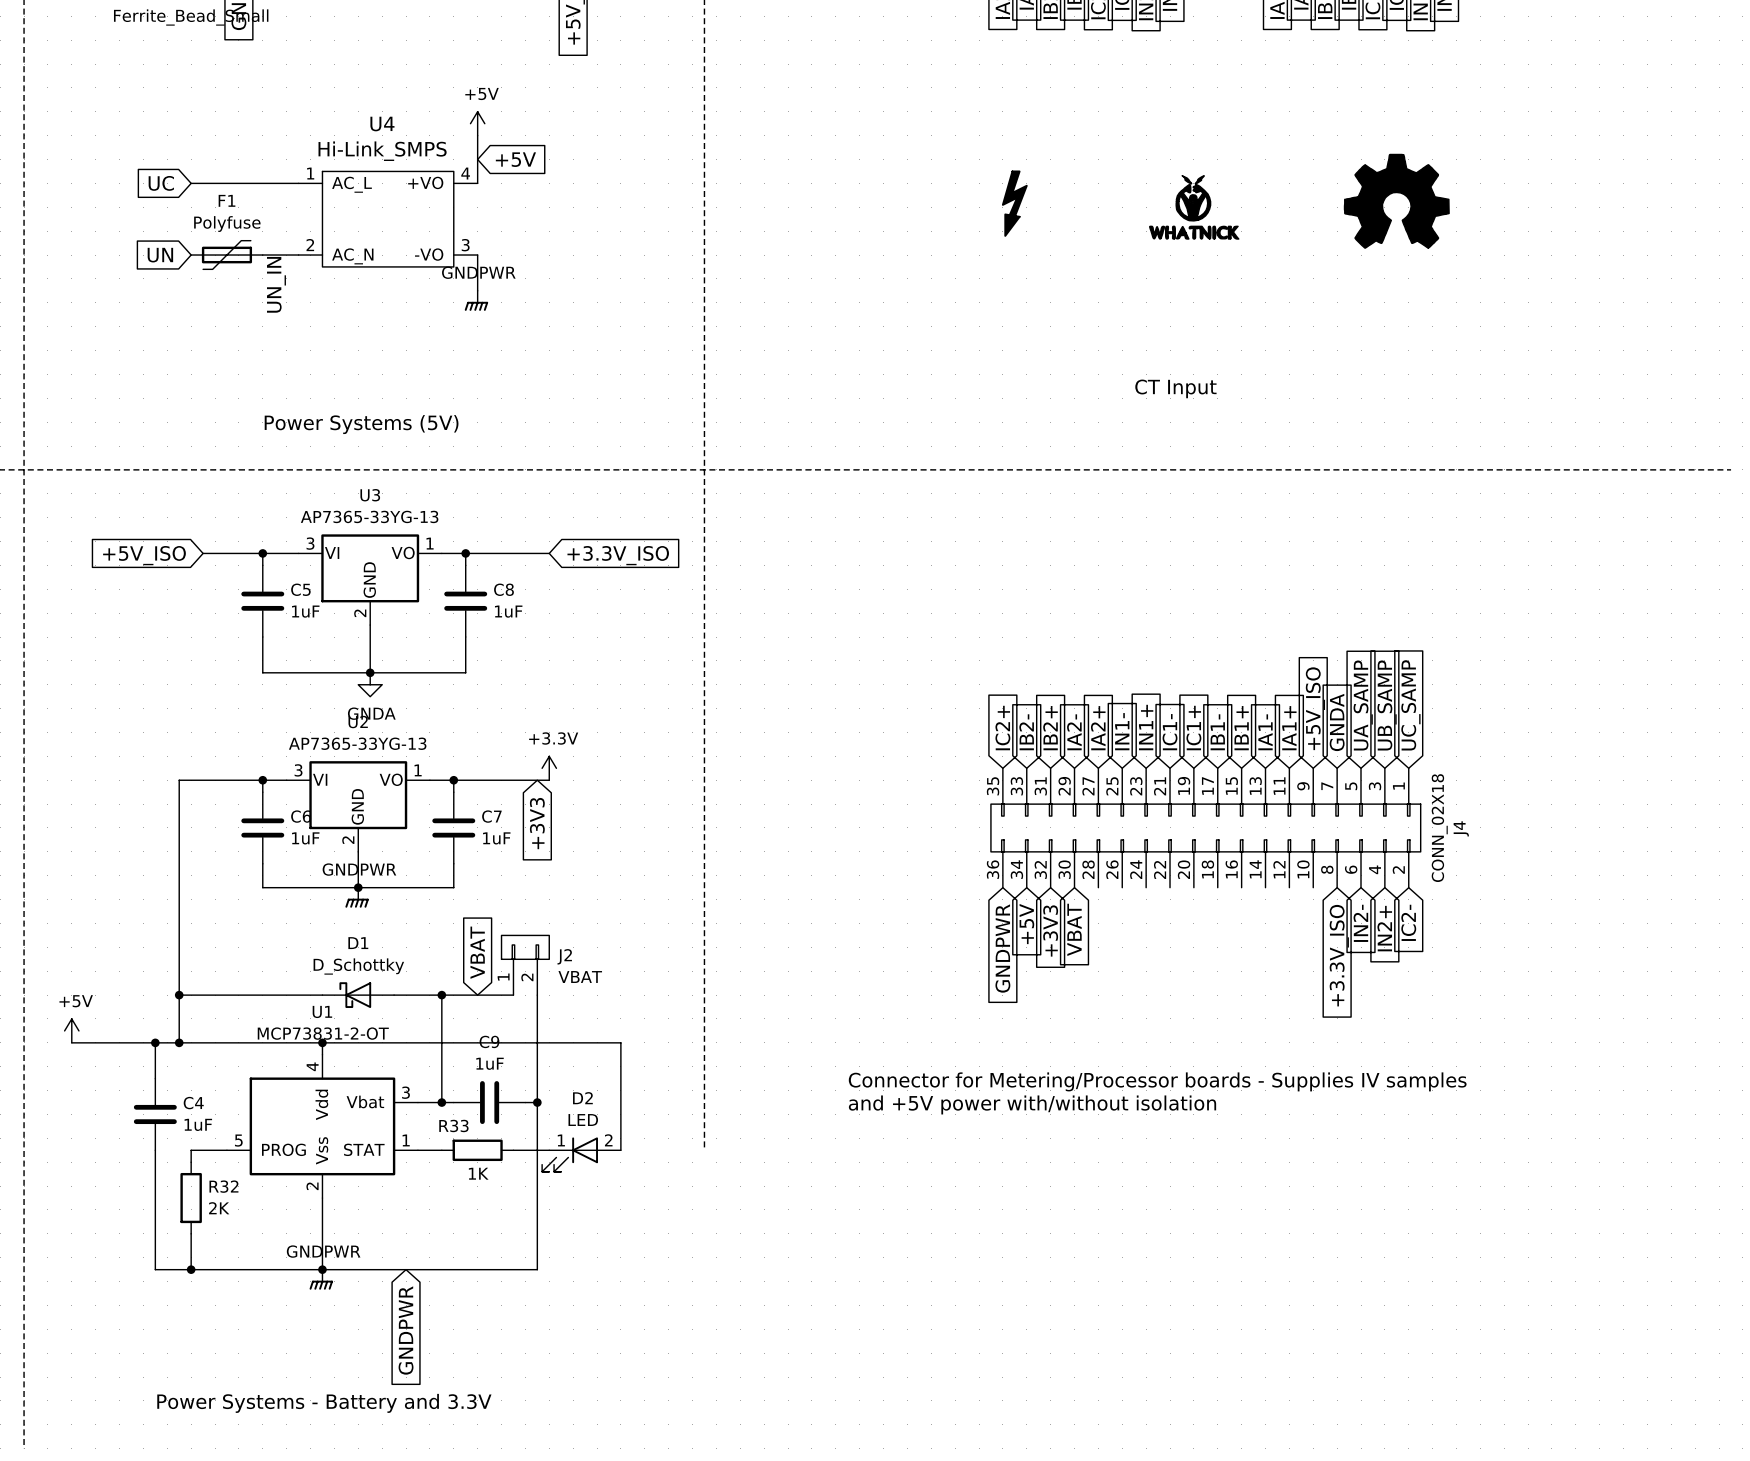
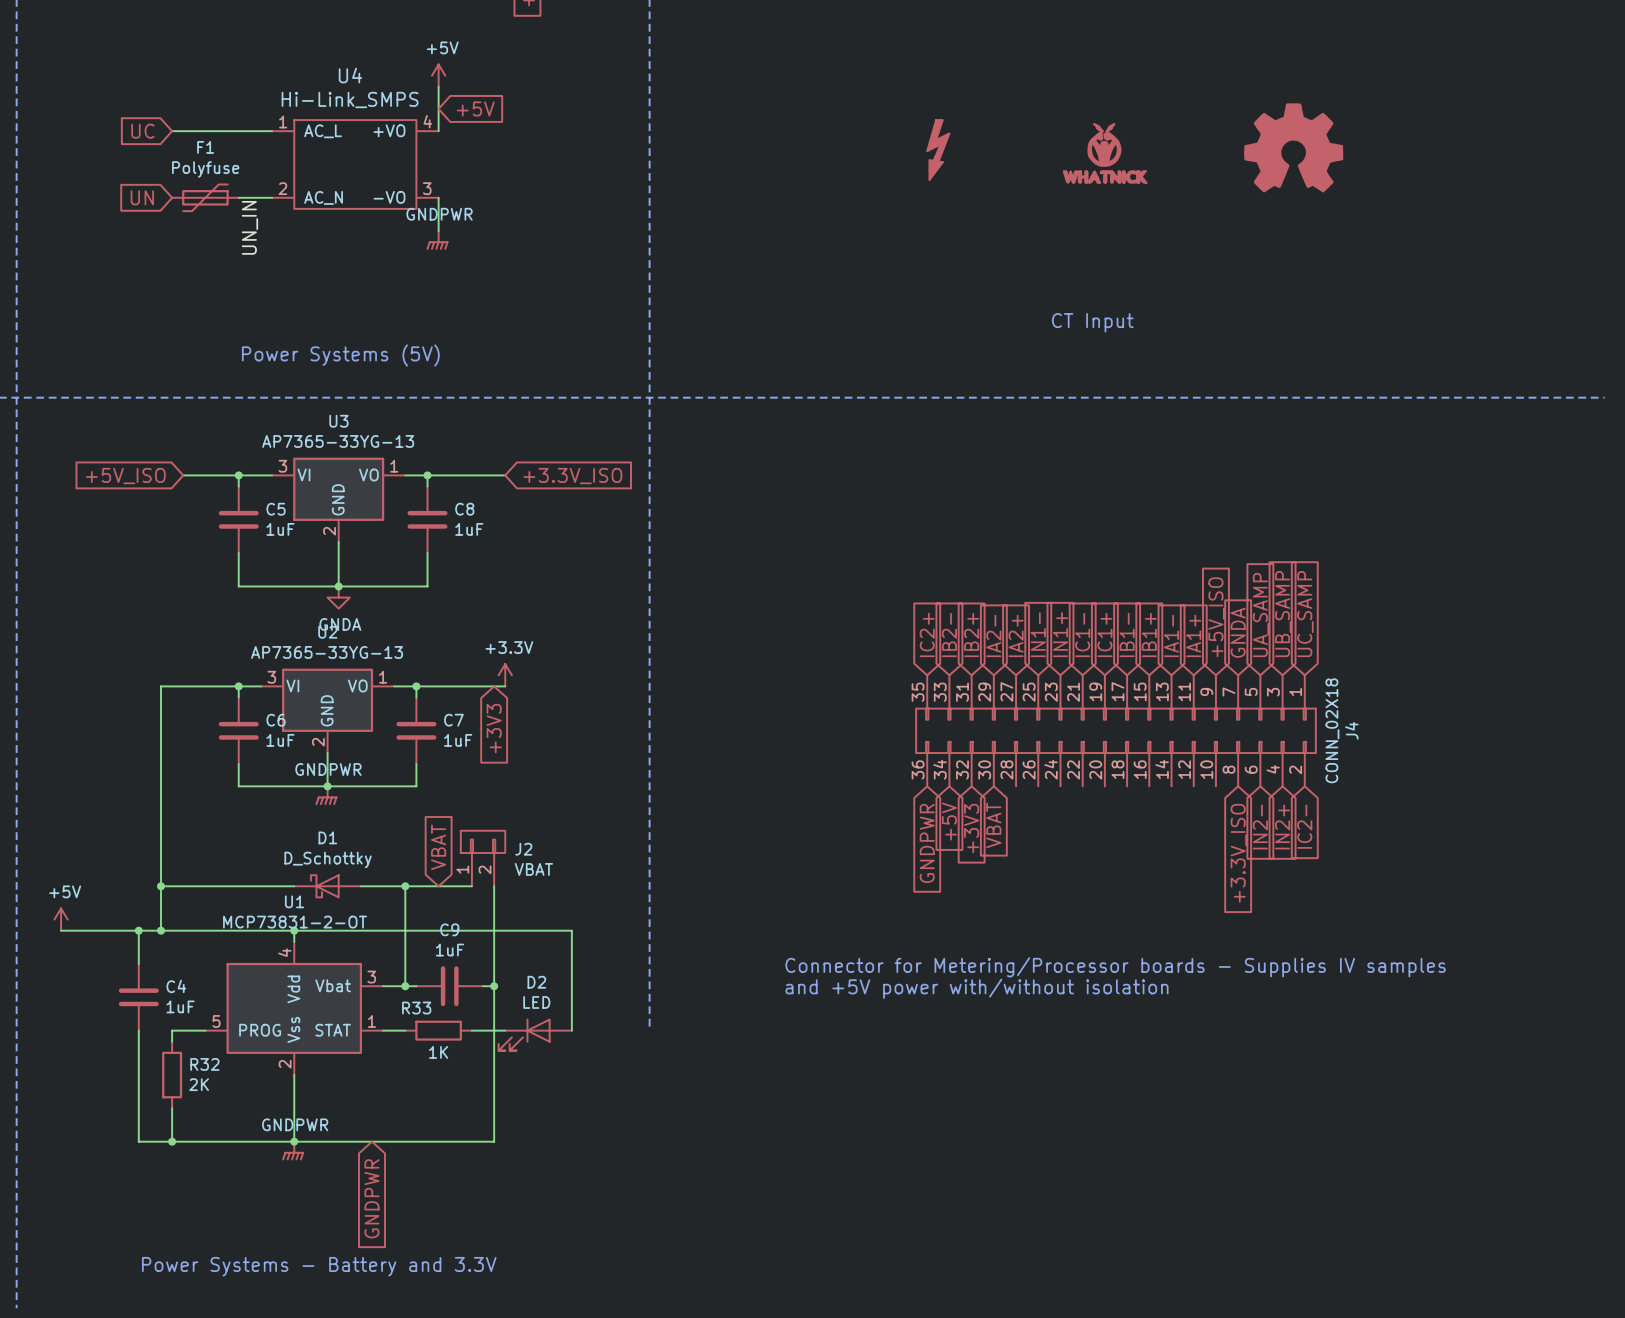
D2 pin number: 1 (561, 1140) -> none
D2 pin number: 2 (608, 1140) -> none

